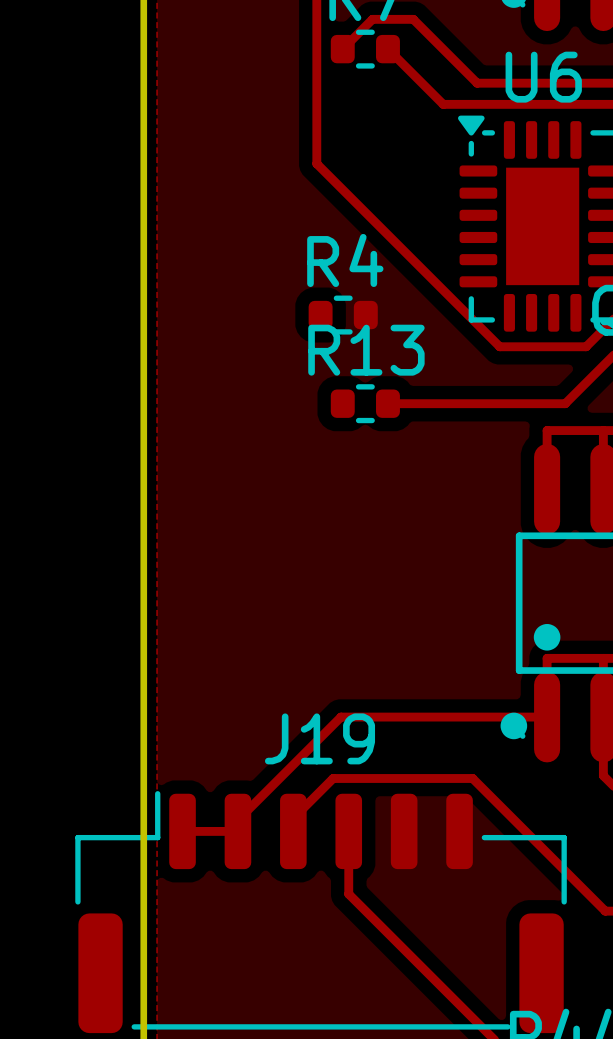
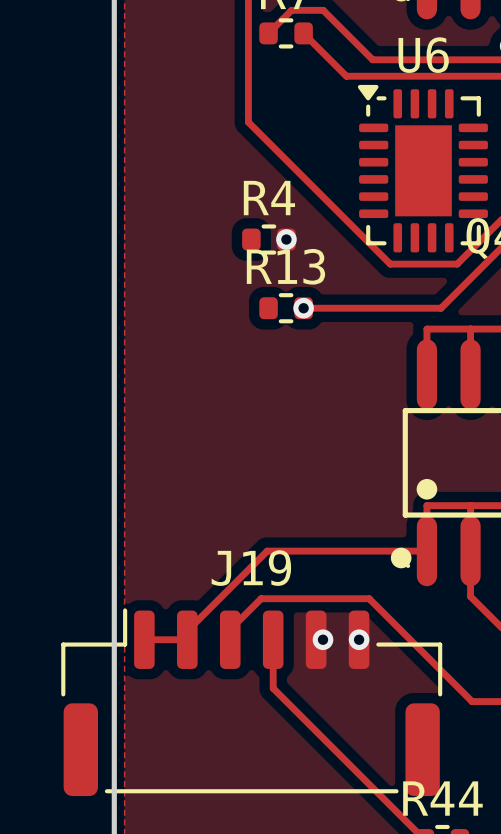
via: none -> (286, 239)
via: none -> (303, 308)
via: none -> (323, 639)
via: none -> (359, 639)

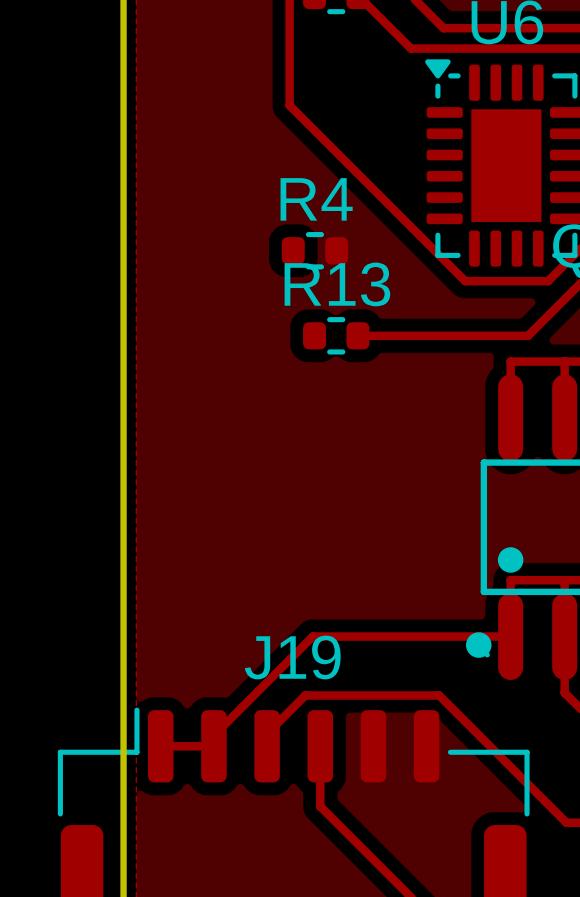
via: (286, 239) -> none
via: (303, 308) -> none
via: (323, 639) -> none
via: (359, 639) -> none

